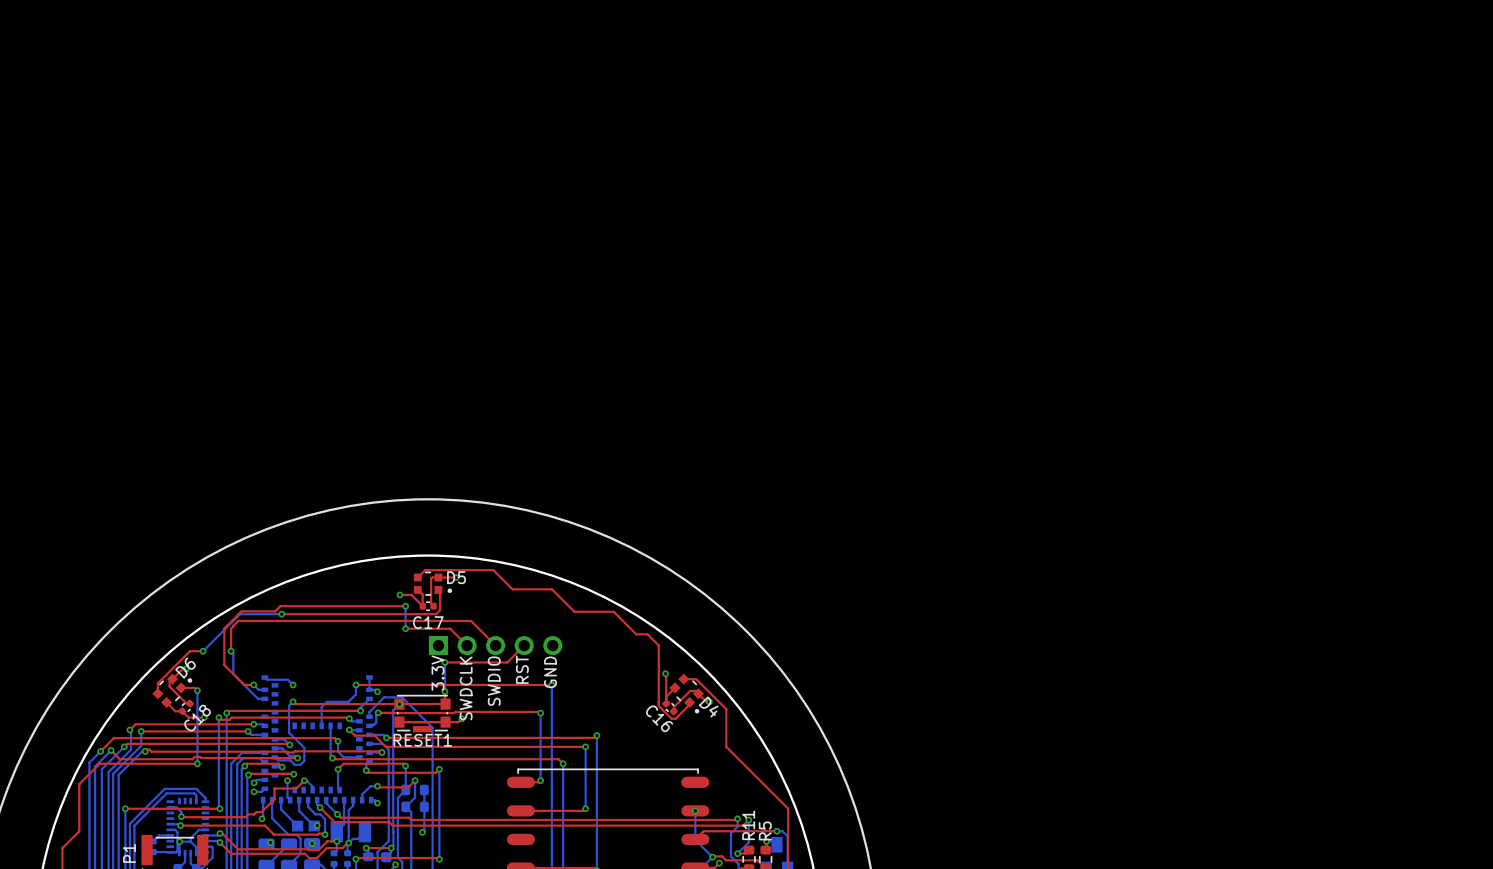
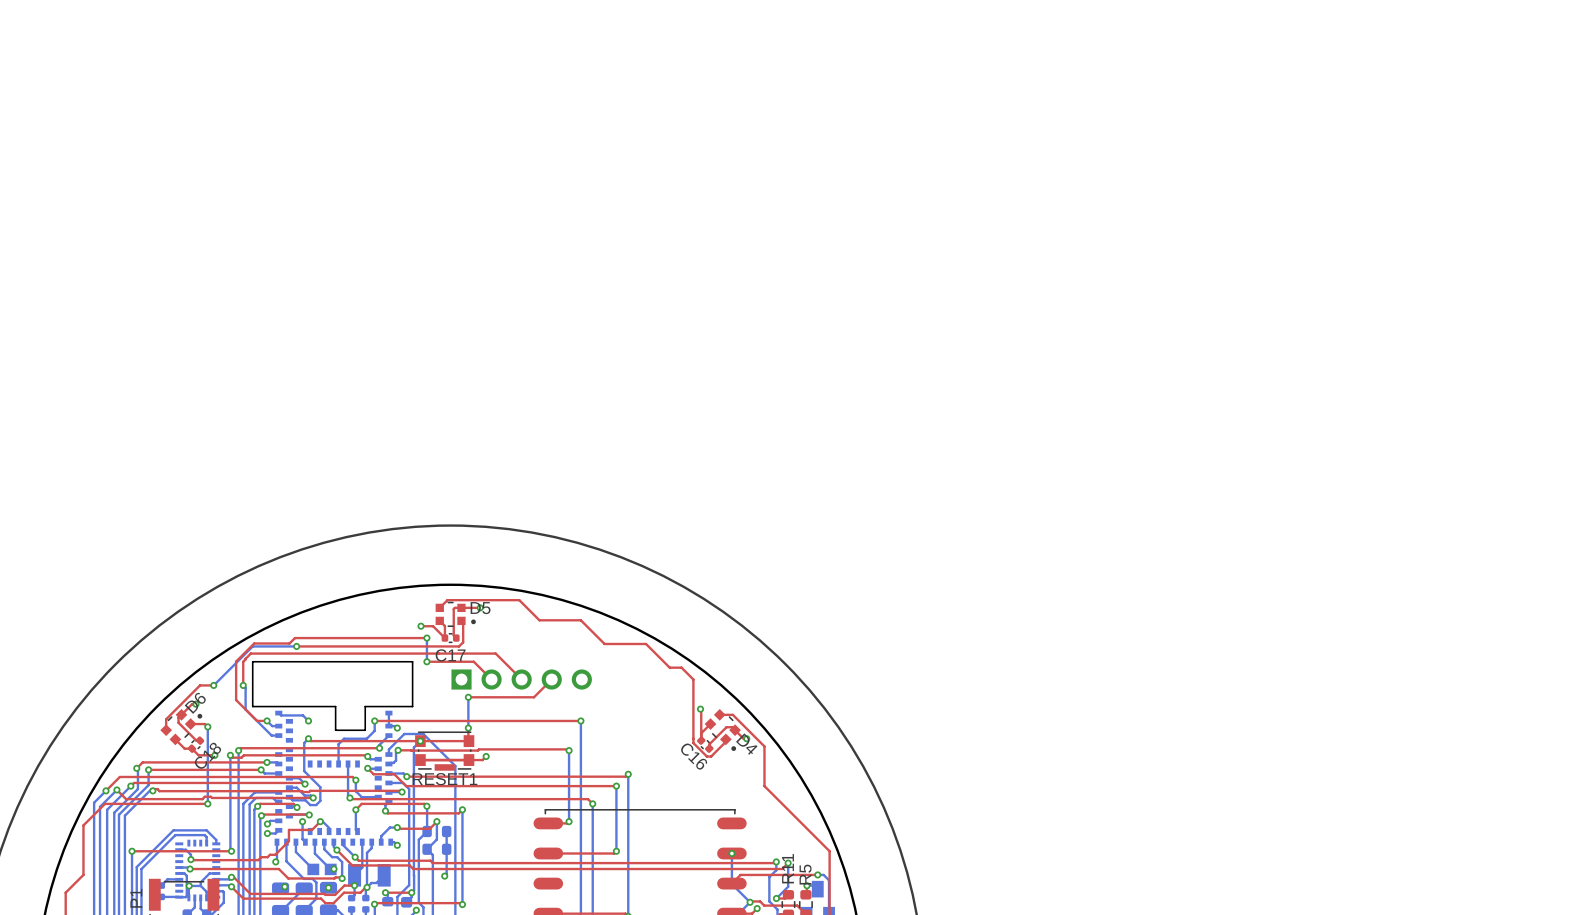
board edge: none -> (252, 661) (412, 661) (412, 706) (365, 706) (365, 730) (335, 730) (335, 706) (252, 706) (252, 661)
text: RST (522, 669) -> none
text: GND (550, 672) -> none
text: 3.3V (437, 673) -> none
text: SWDIO (494, 681) -> none
text: SWDCLK (466, 688) -> none

